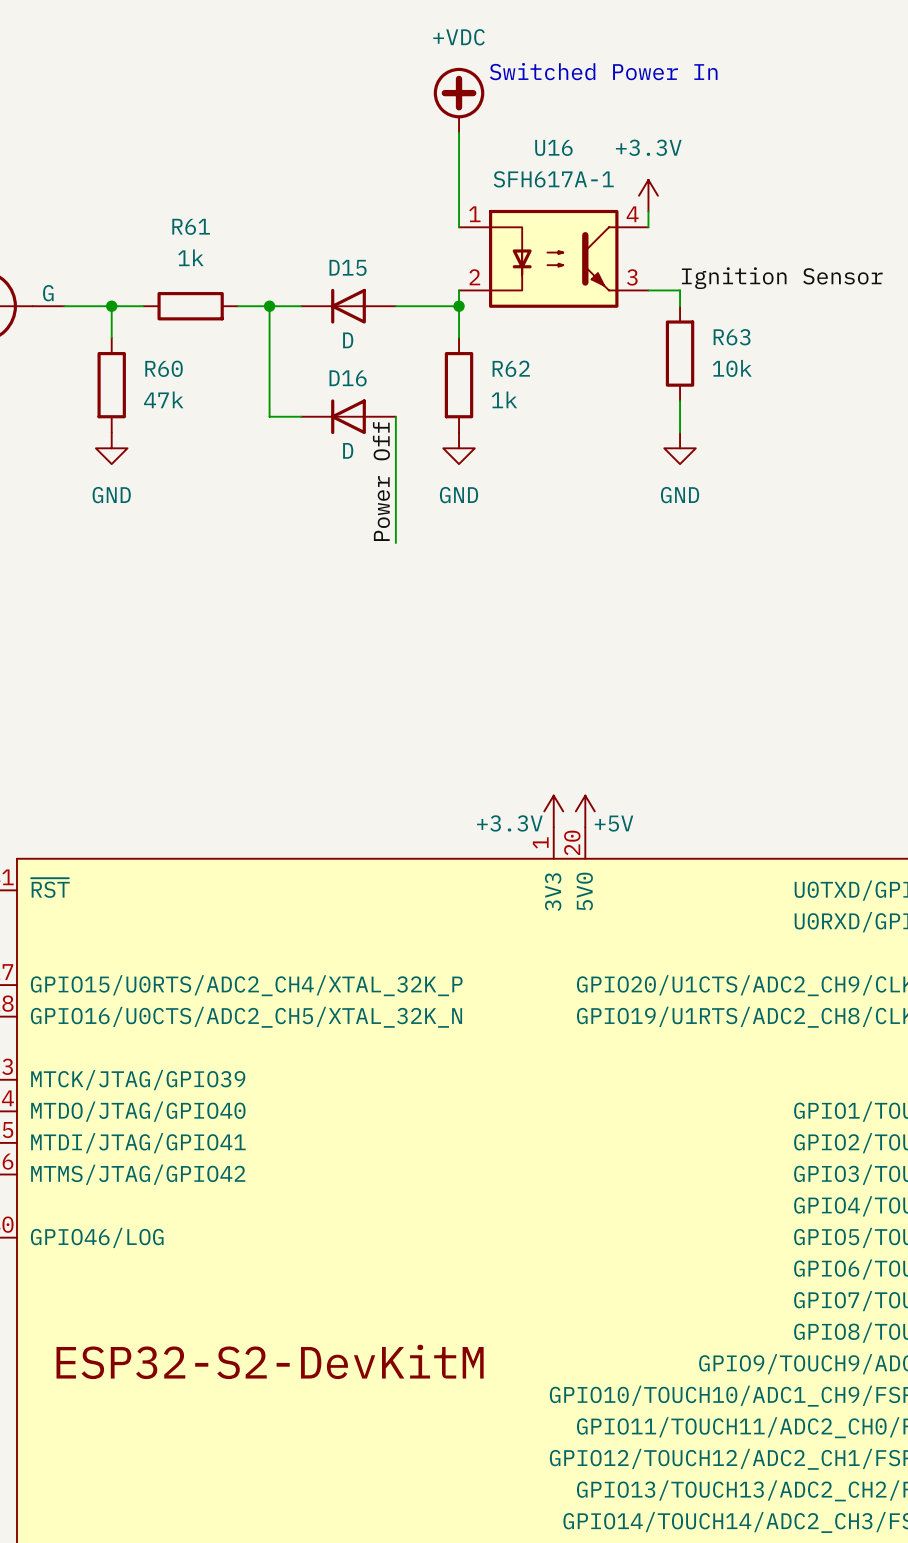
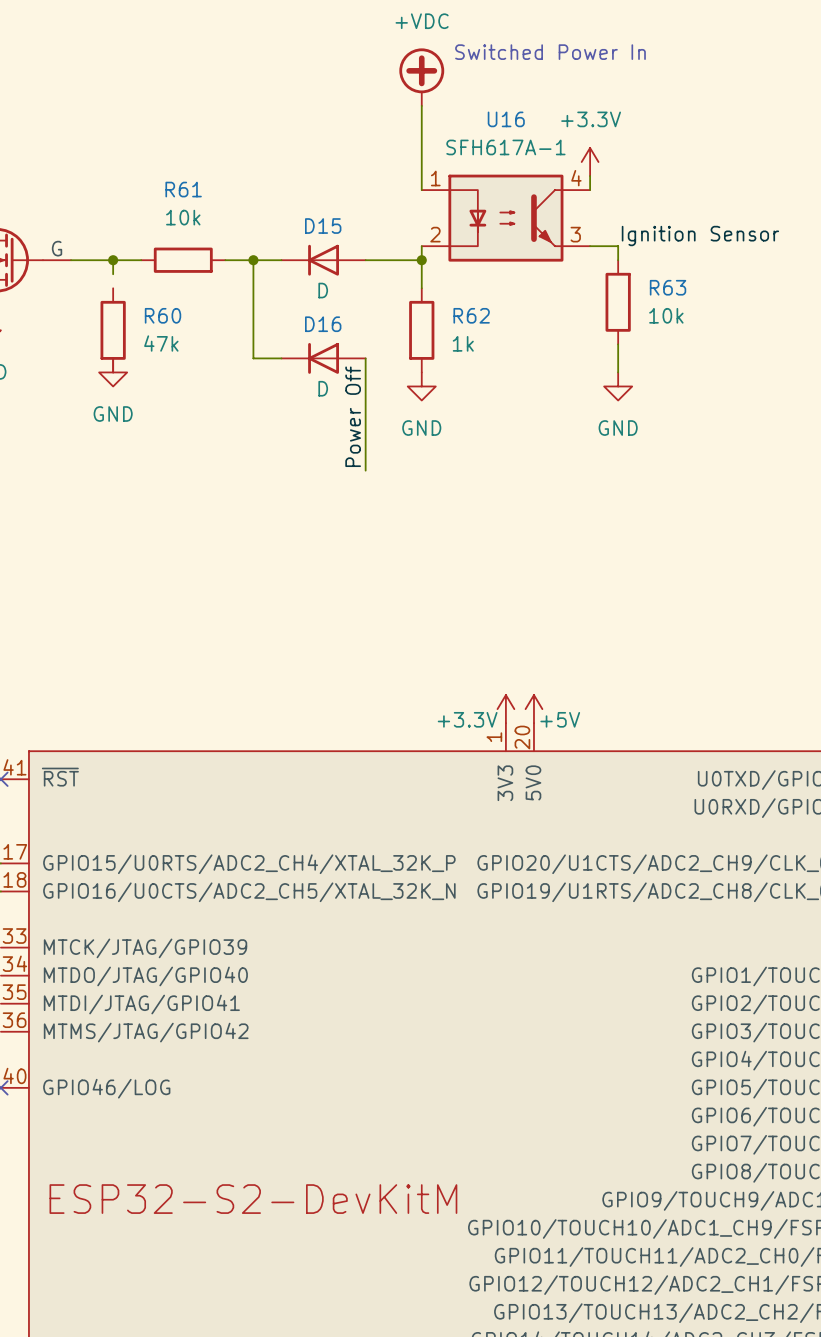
R61 value: 1k (190, 257) -> 10k (183, 217)
wire: (111, 322) (111, 337) -> none
power symbol position: GND (111, 448) -> GND (113, 372)

